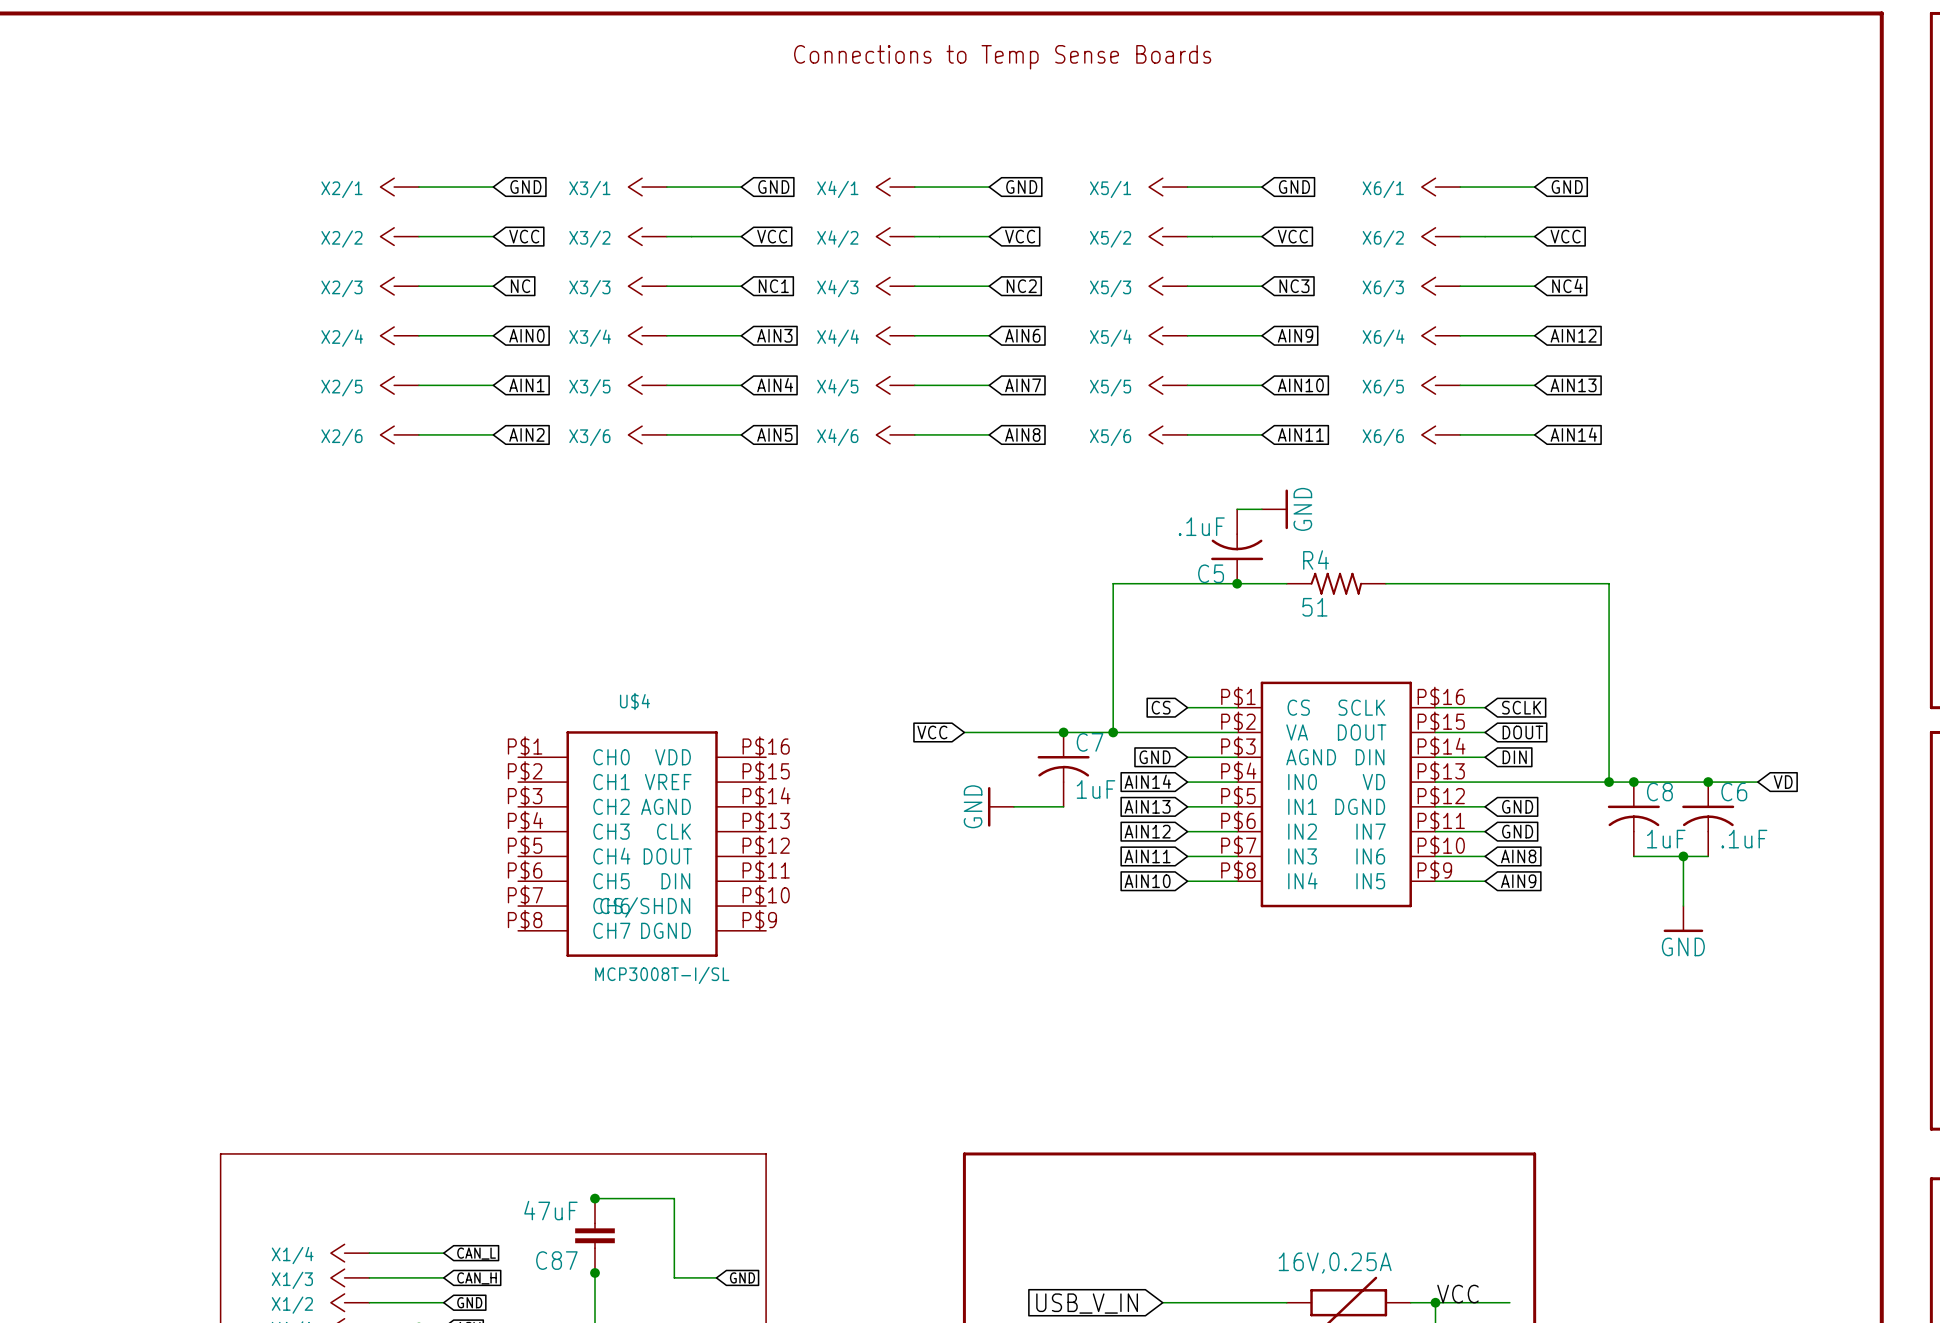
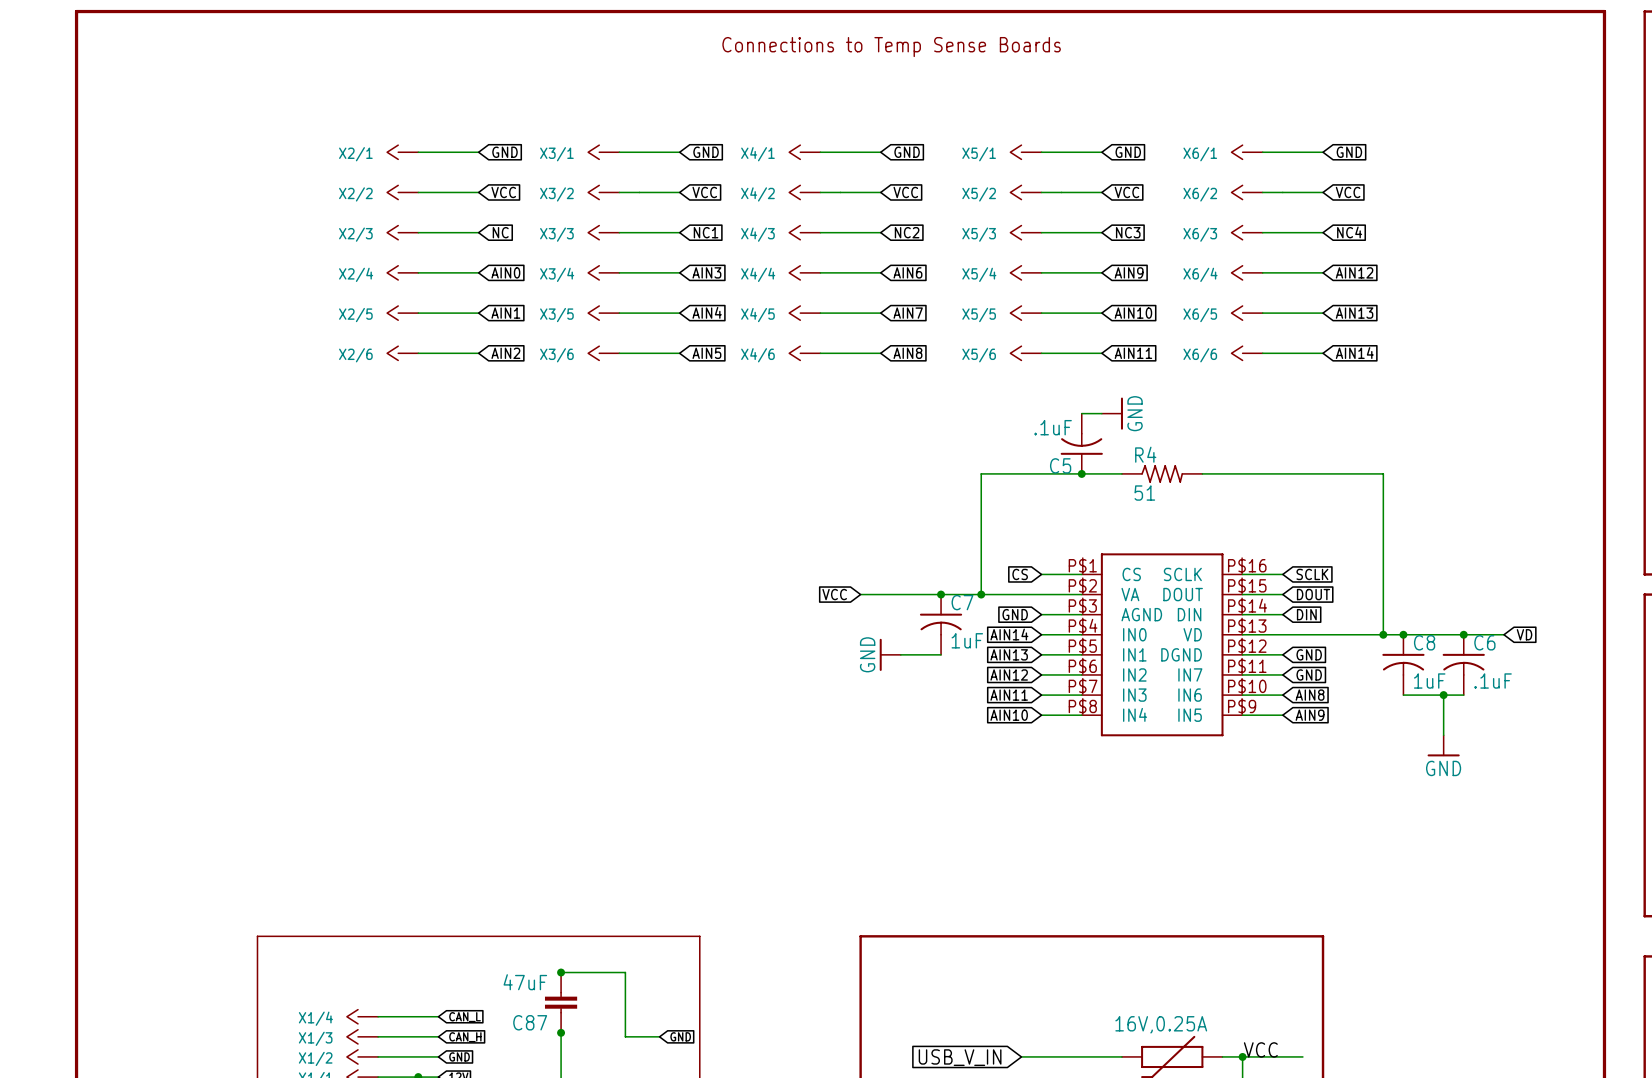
U$4: MCP3008T-I/SL (642, 844) -> none

